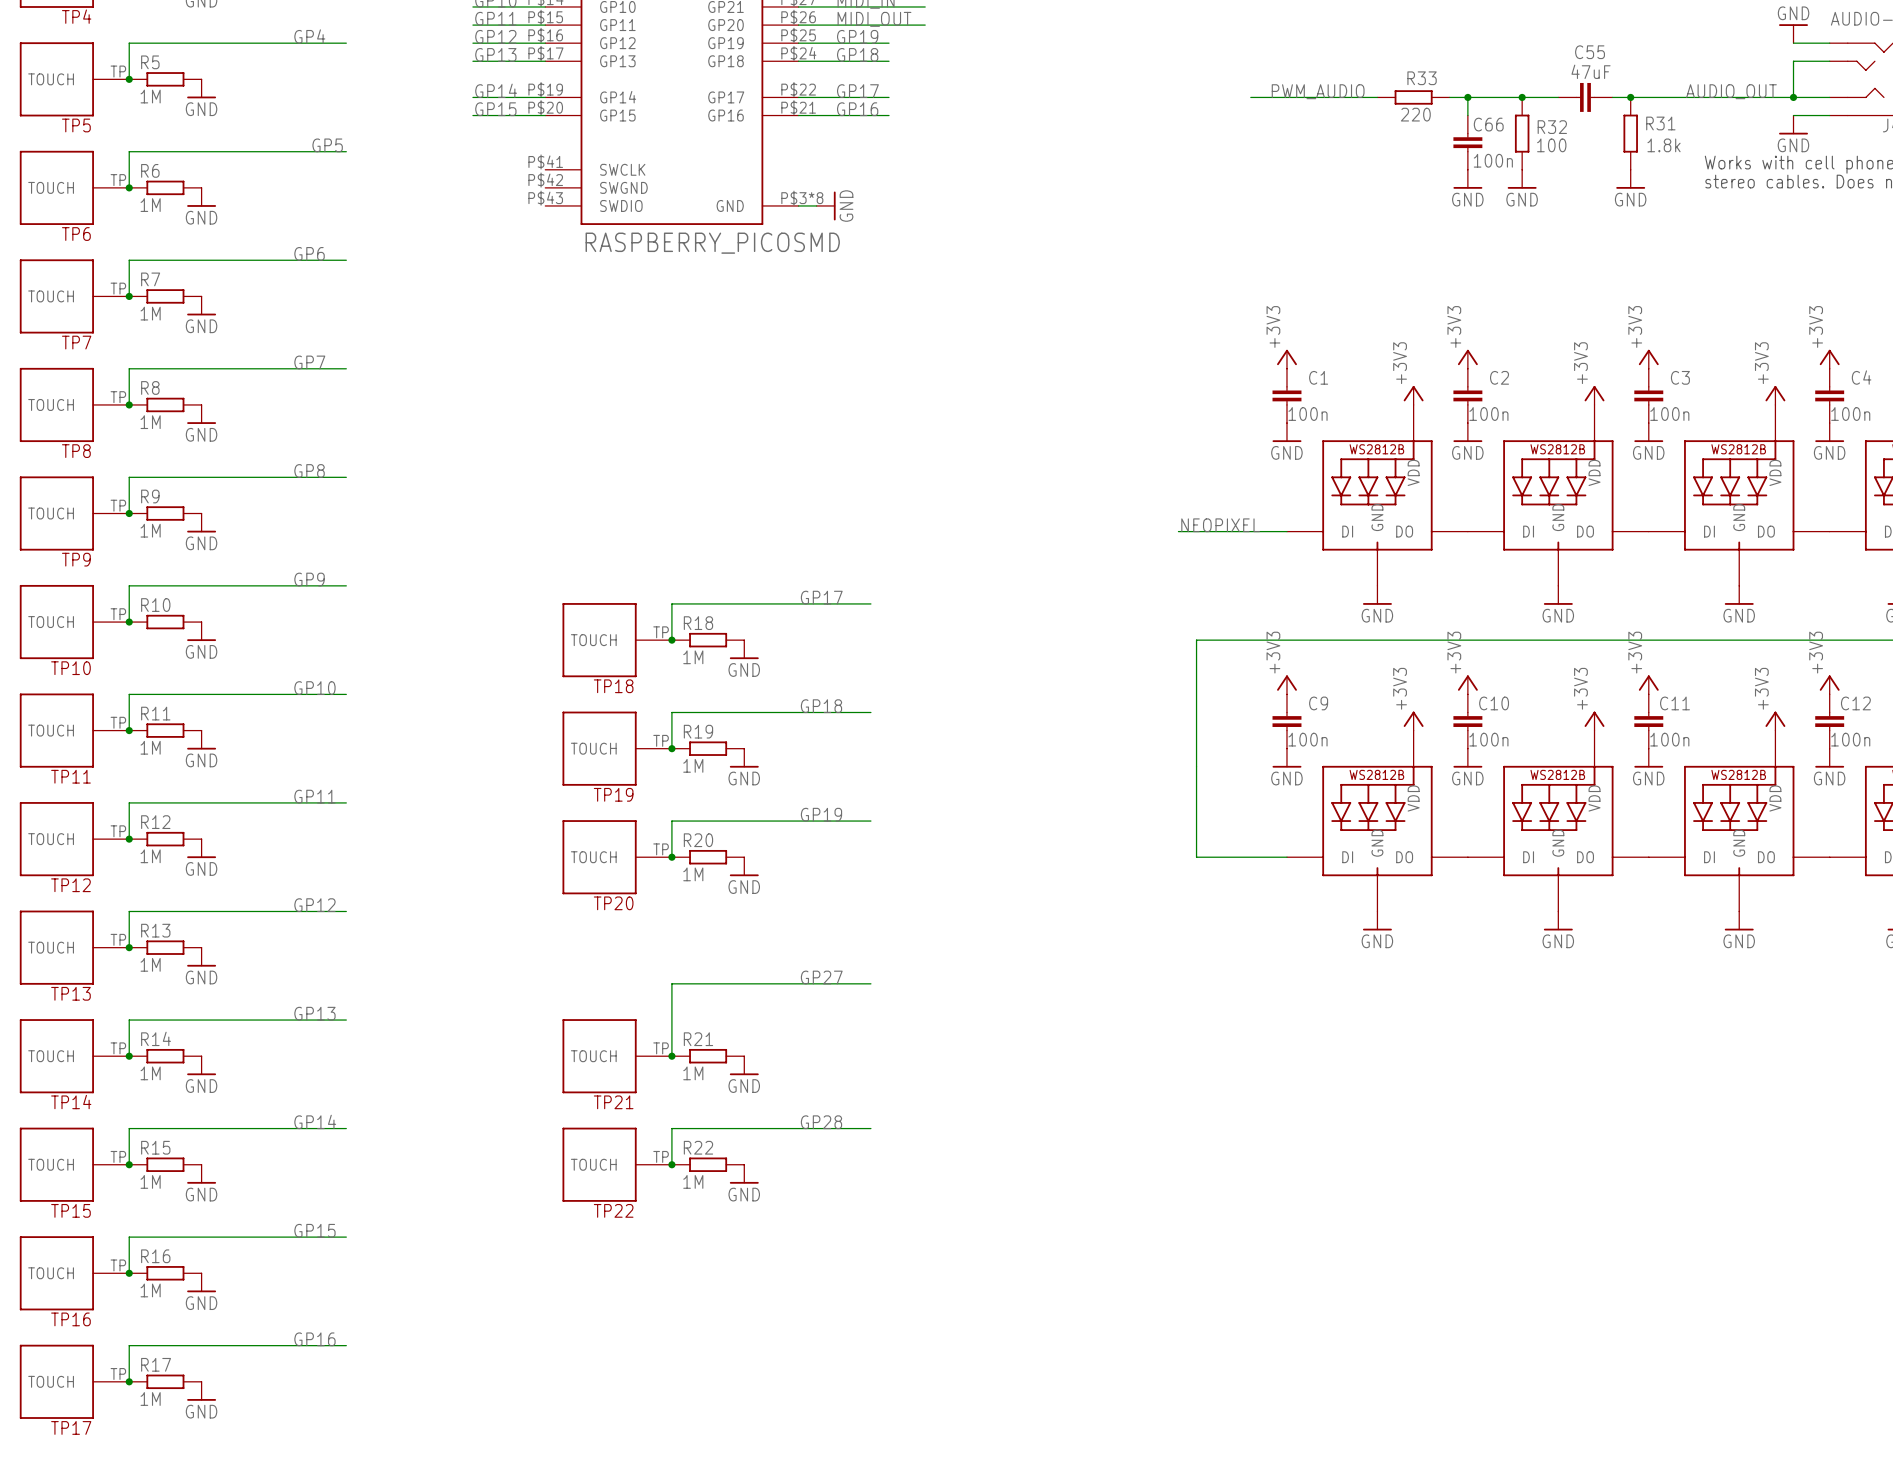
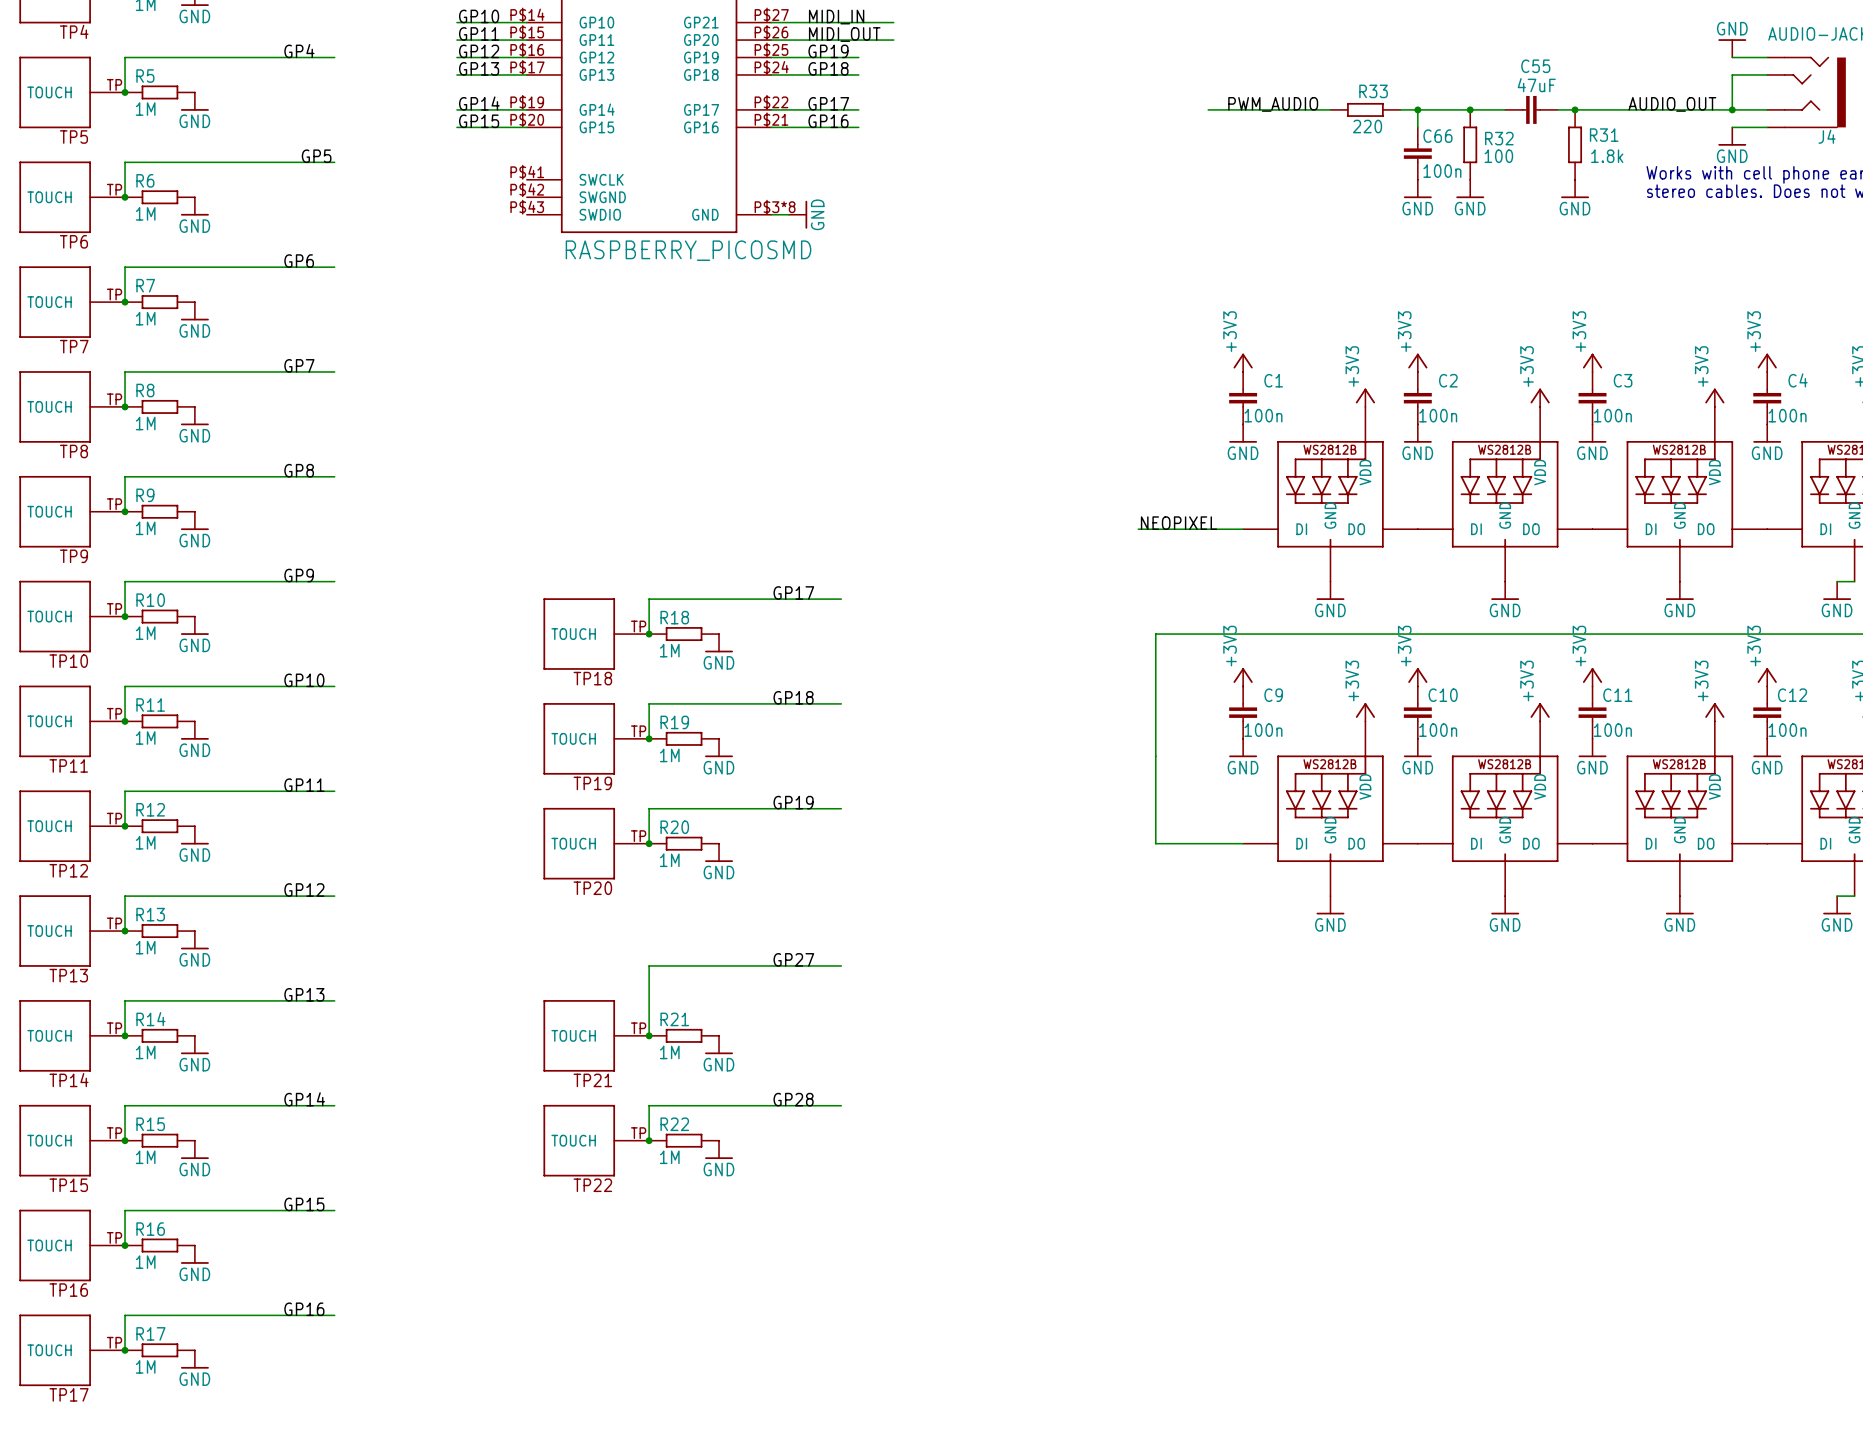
R10 value: none -> 1M (145, 633)

